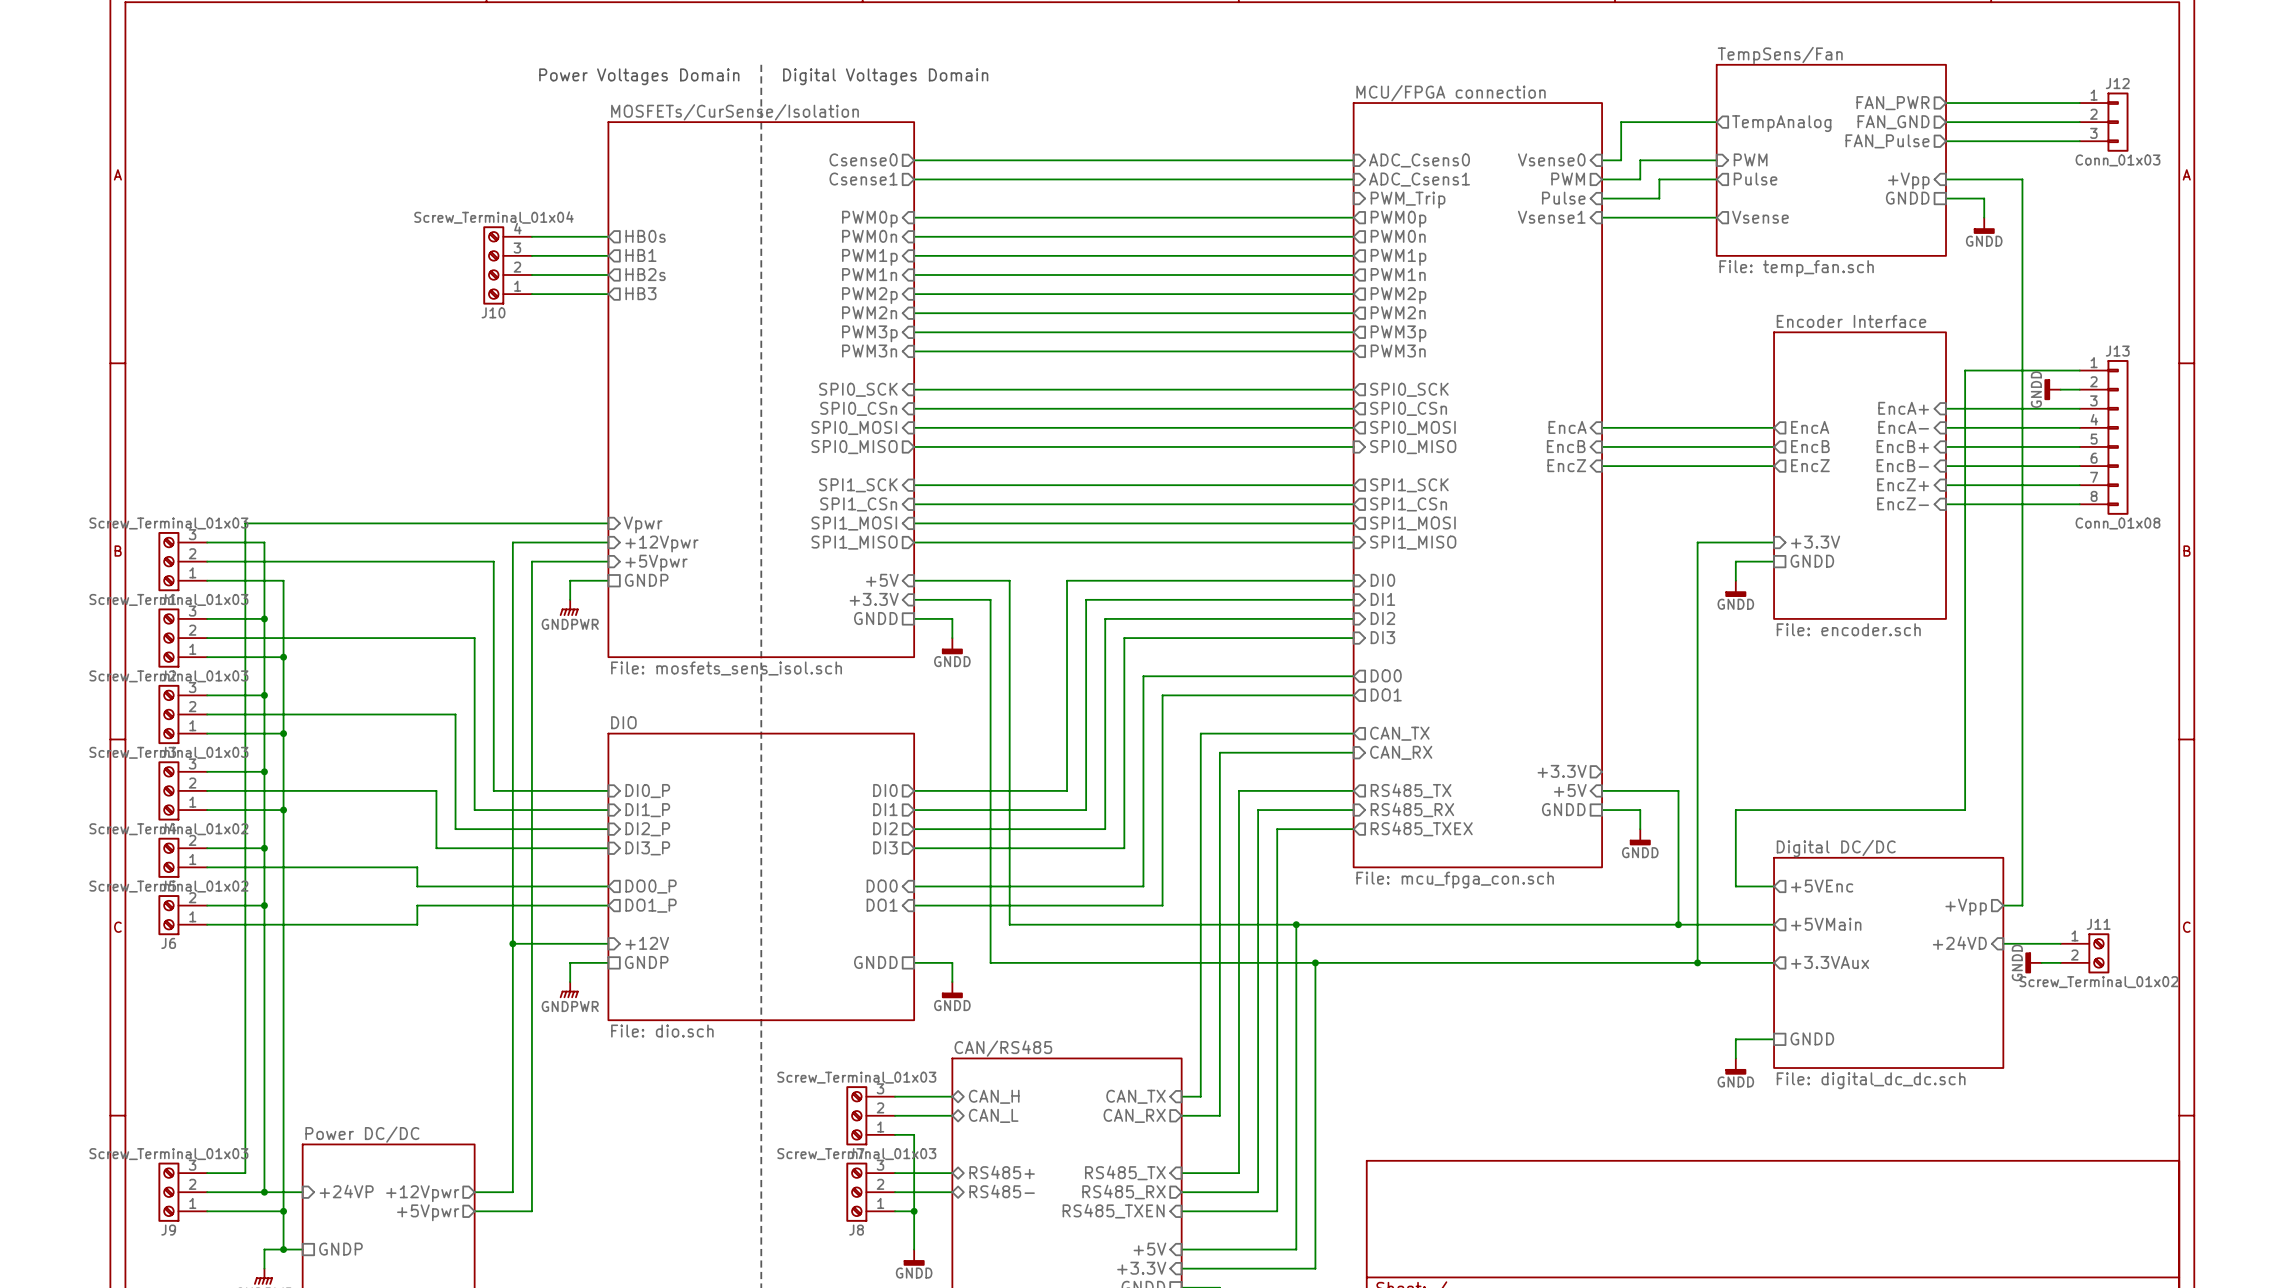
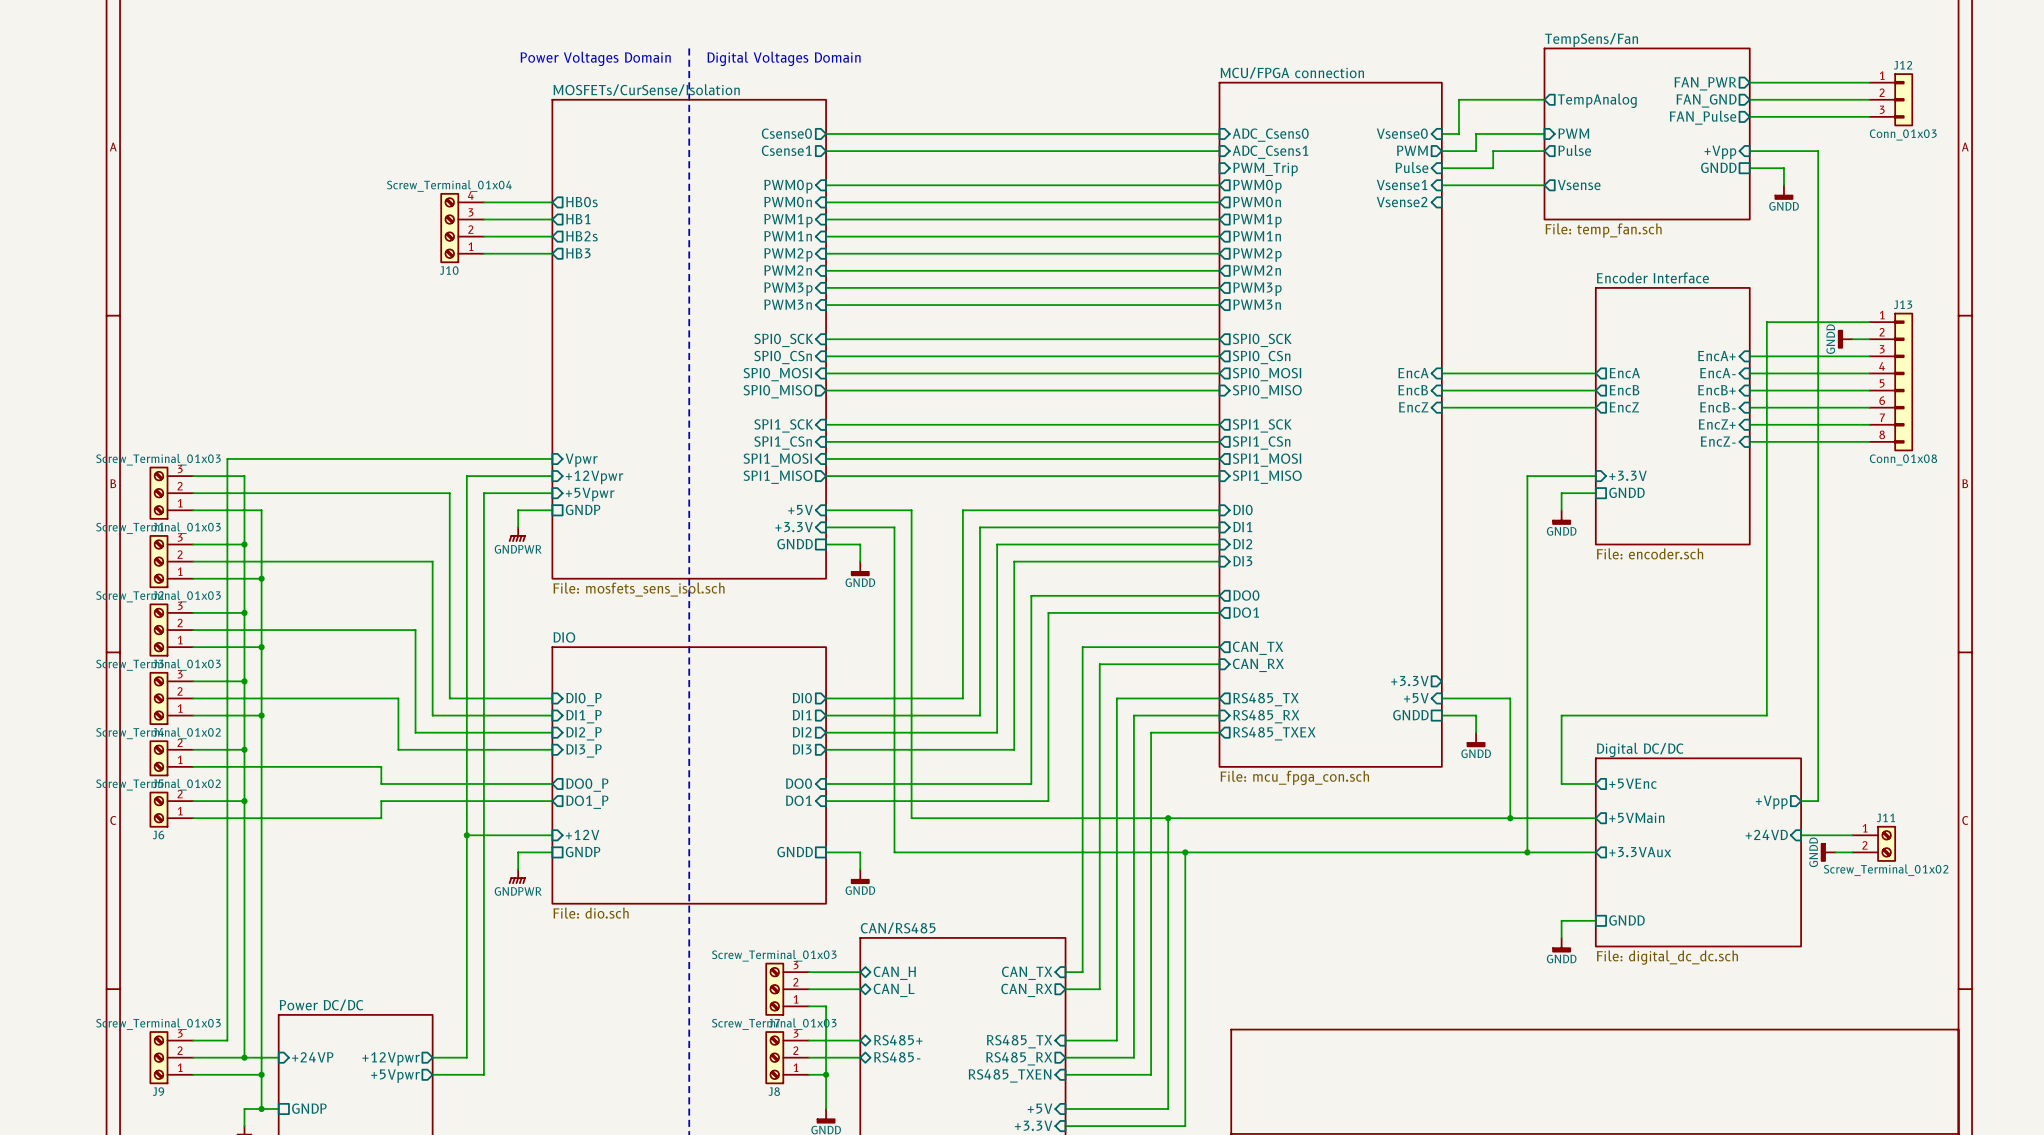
sheet pin: none -> Vsense2 (1402, 202)

